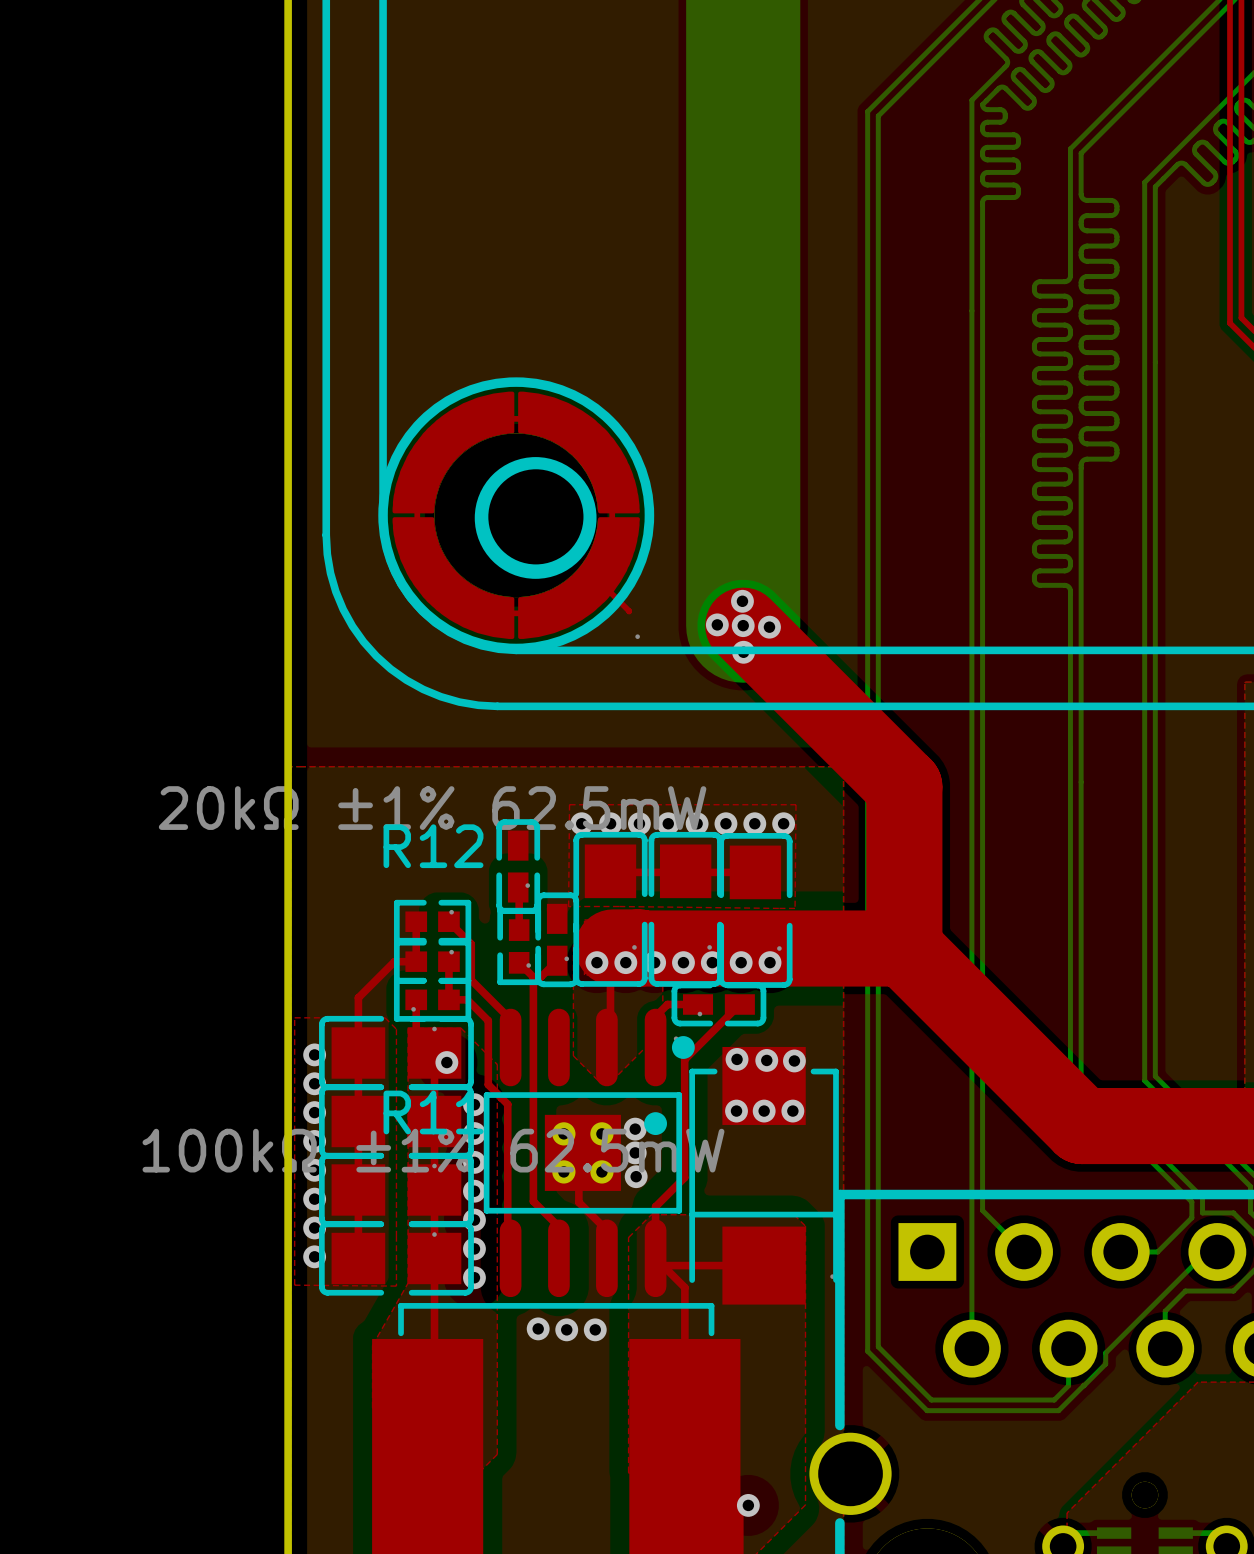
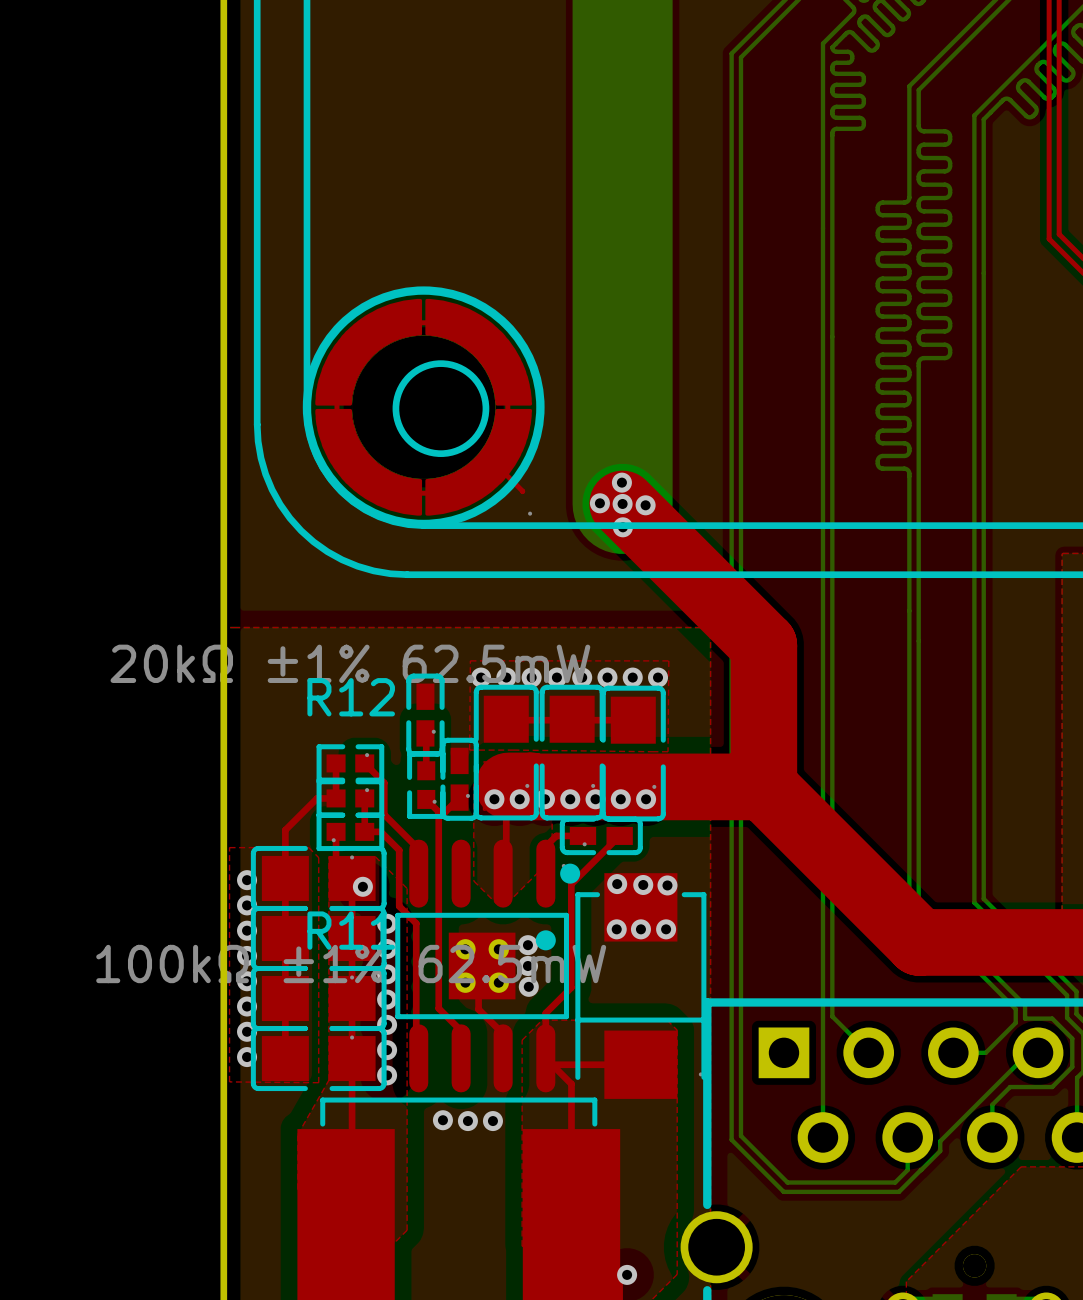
drawing: [474, 457, 597, 579] -> none

